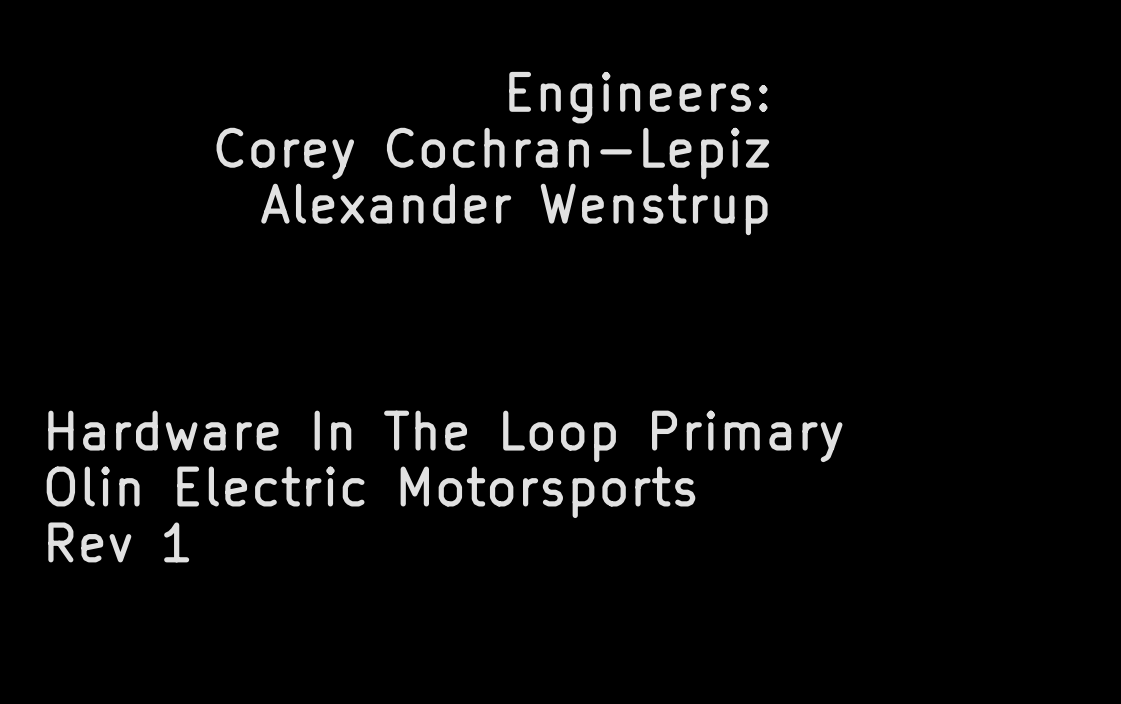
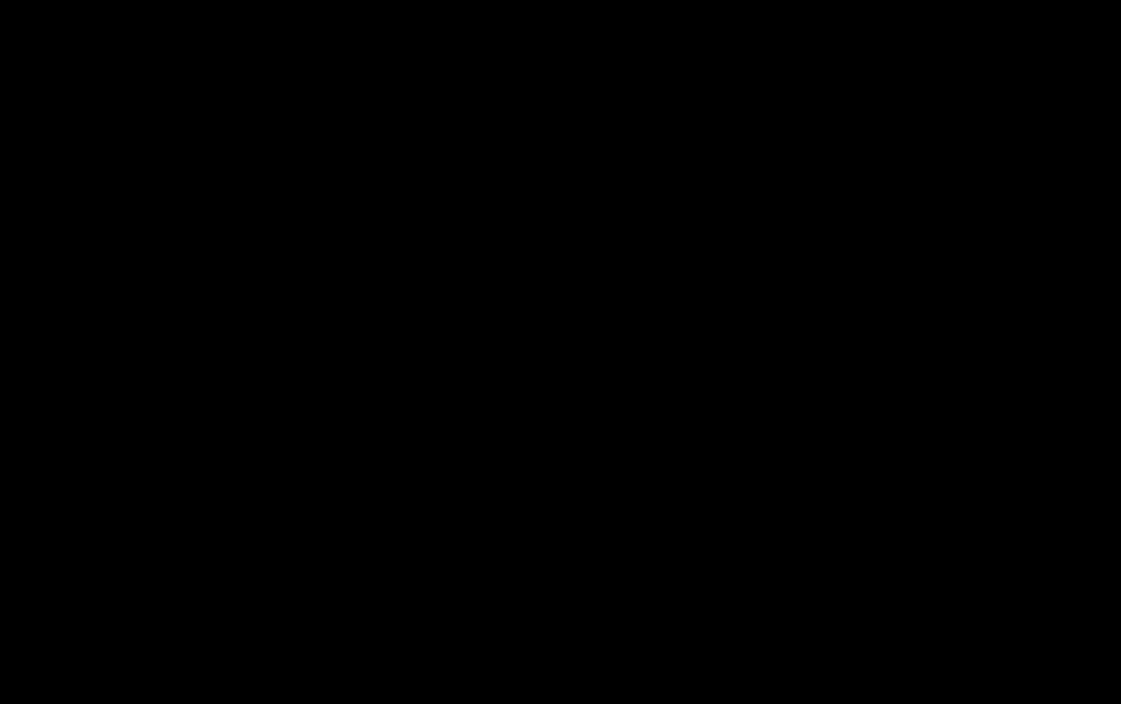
text: Engineers: (638, 97) -> none
text: Corey Cochran-Lepiz (492, 153) -> none
text: Alexander Wenstrup (514, 209) -> none
text: Hardware In The Loop Primary (445, 436) -> none
text: Olin Electric Motorsports (370, 492) -> none
text: Rev 1 (118, 542) -> none

